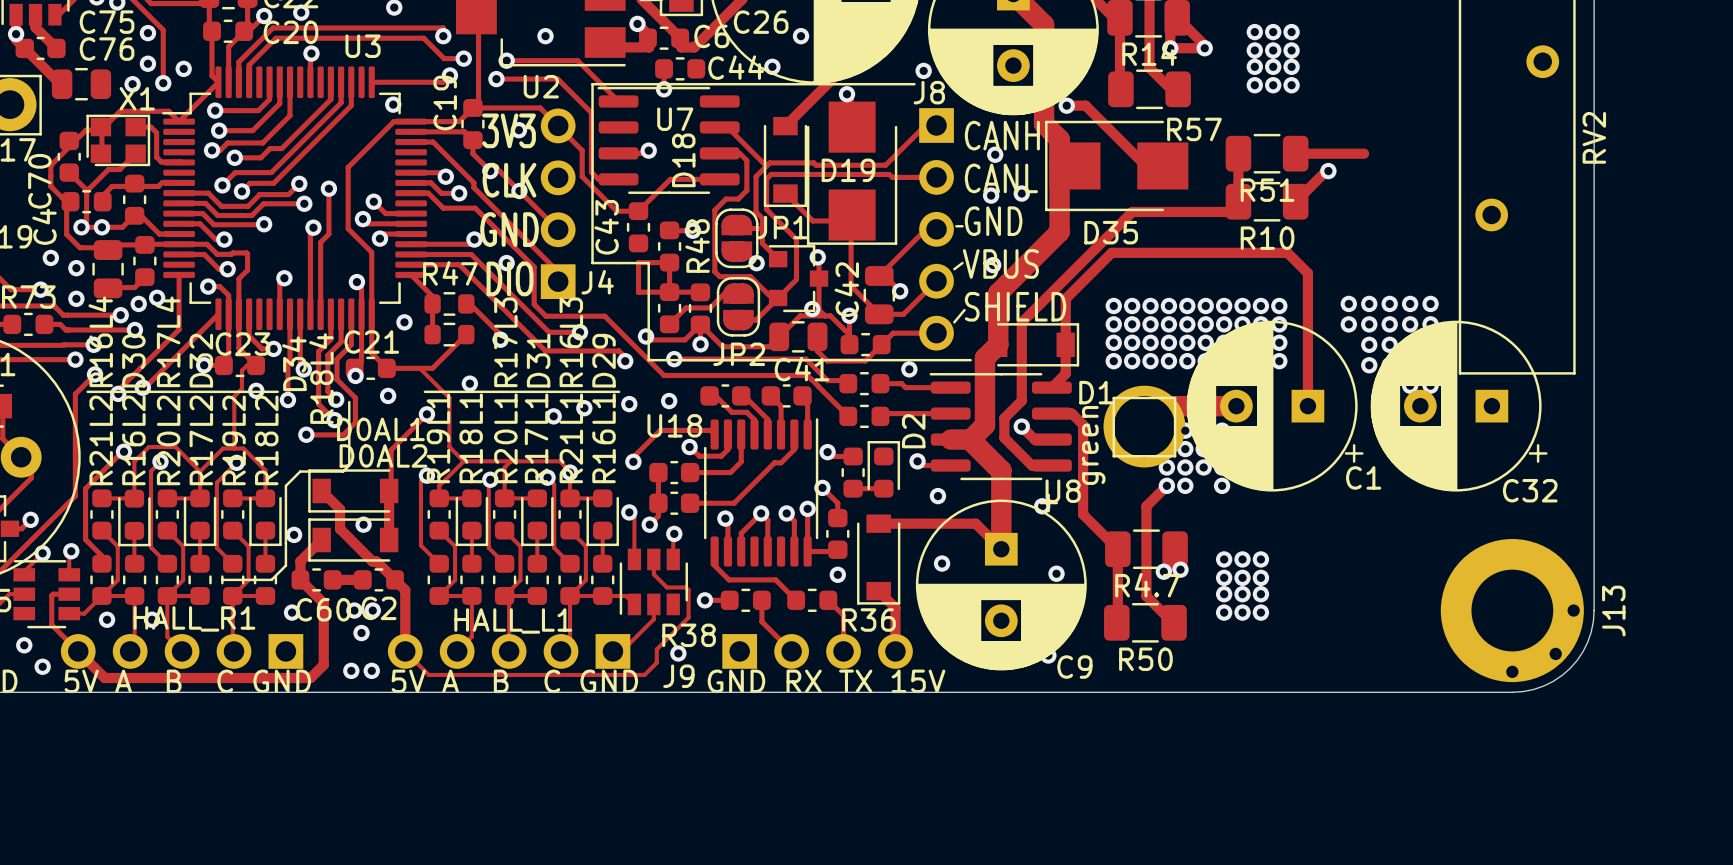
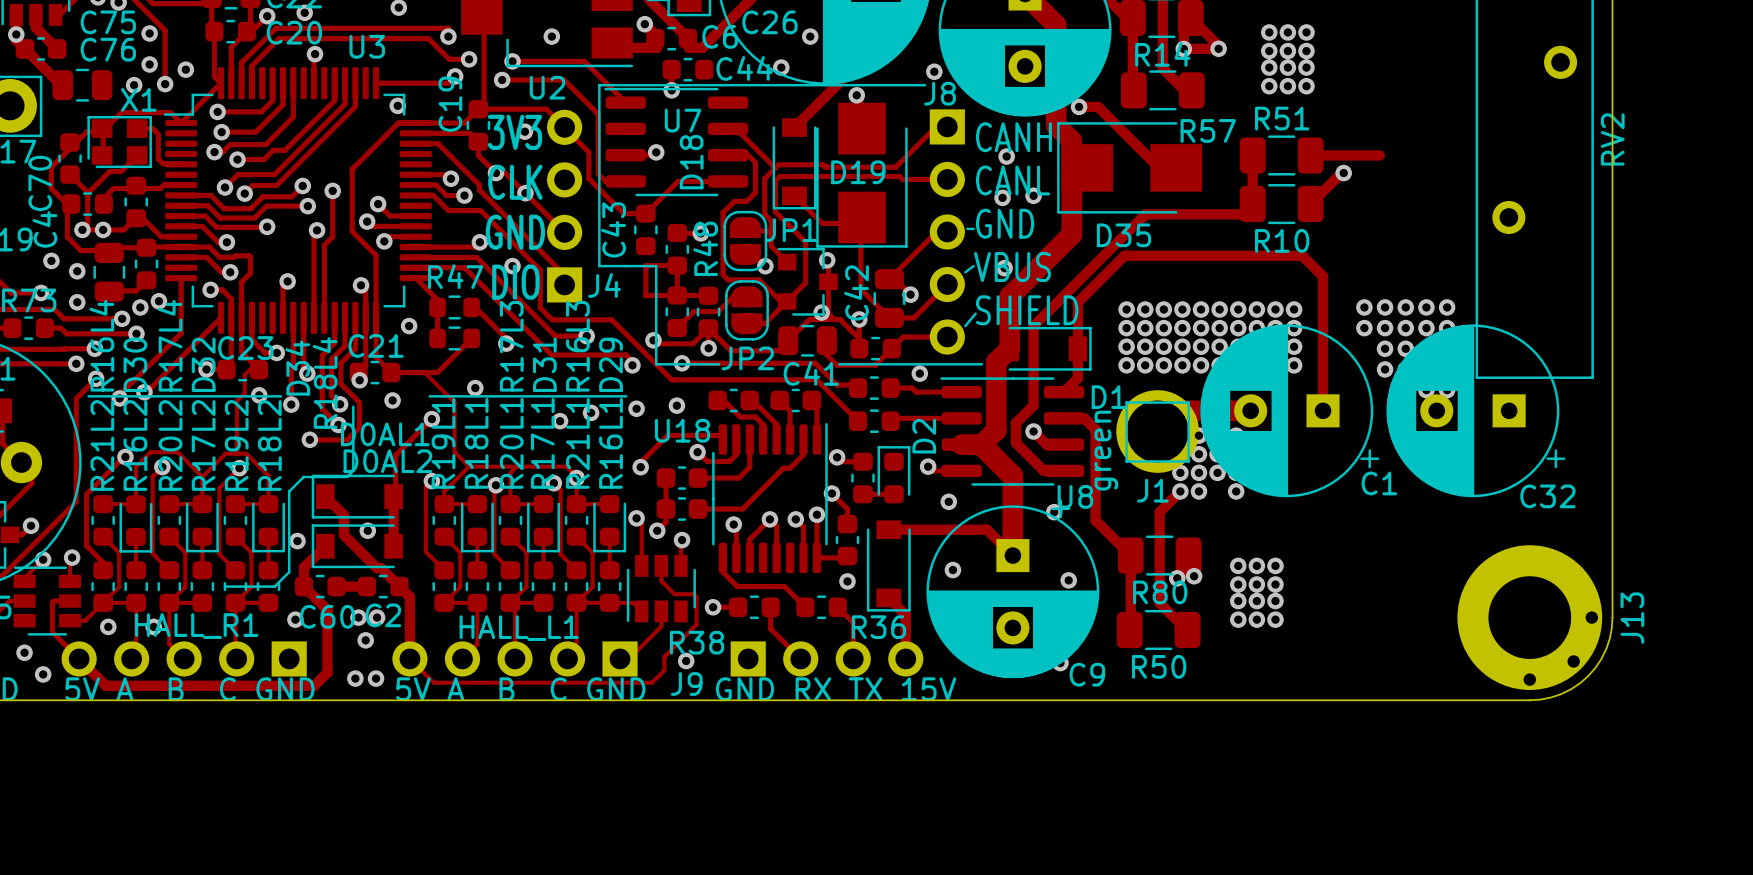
R51 name position: R51 (1267, 190) -> R51 (1282, 118)
line: (711, 360) (829, 360) -> none
J1 name: none -> J1 (1153, 490)
R4.7 name: R4.7 (1147, 585) -> R80 (1160, 592)

